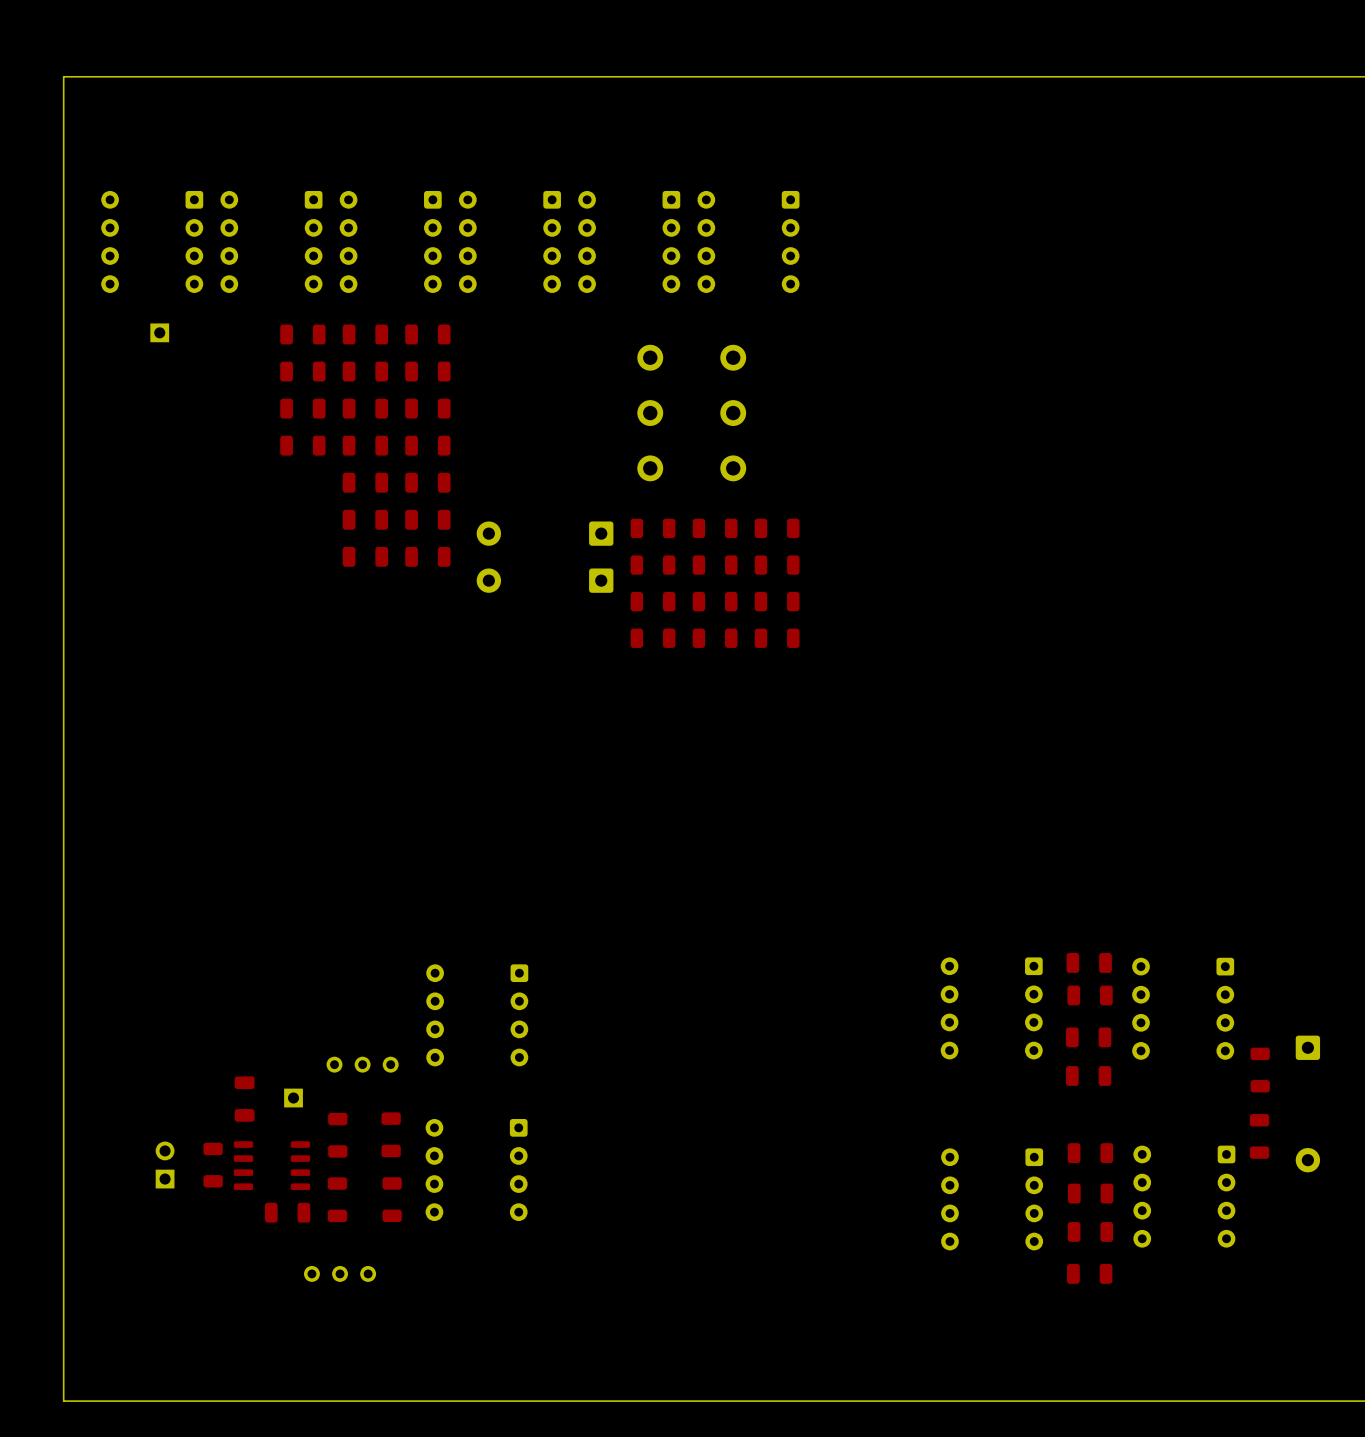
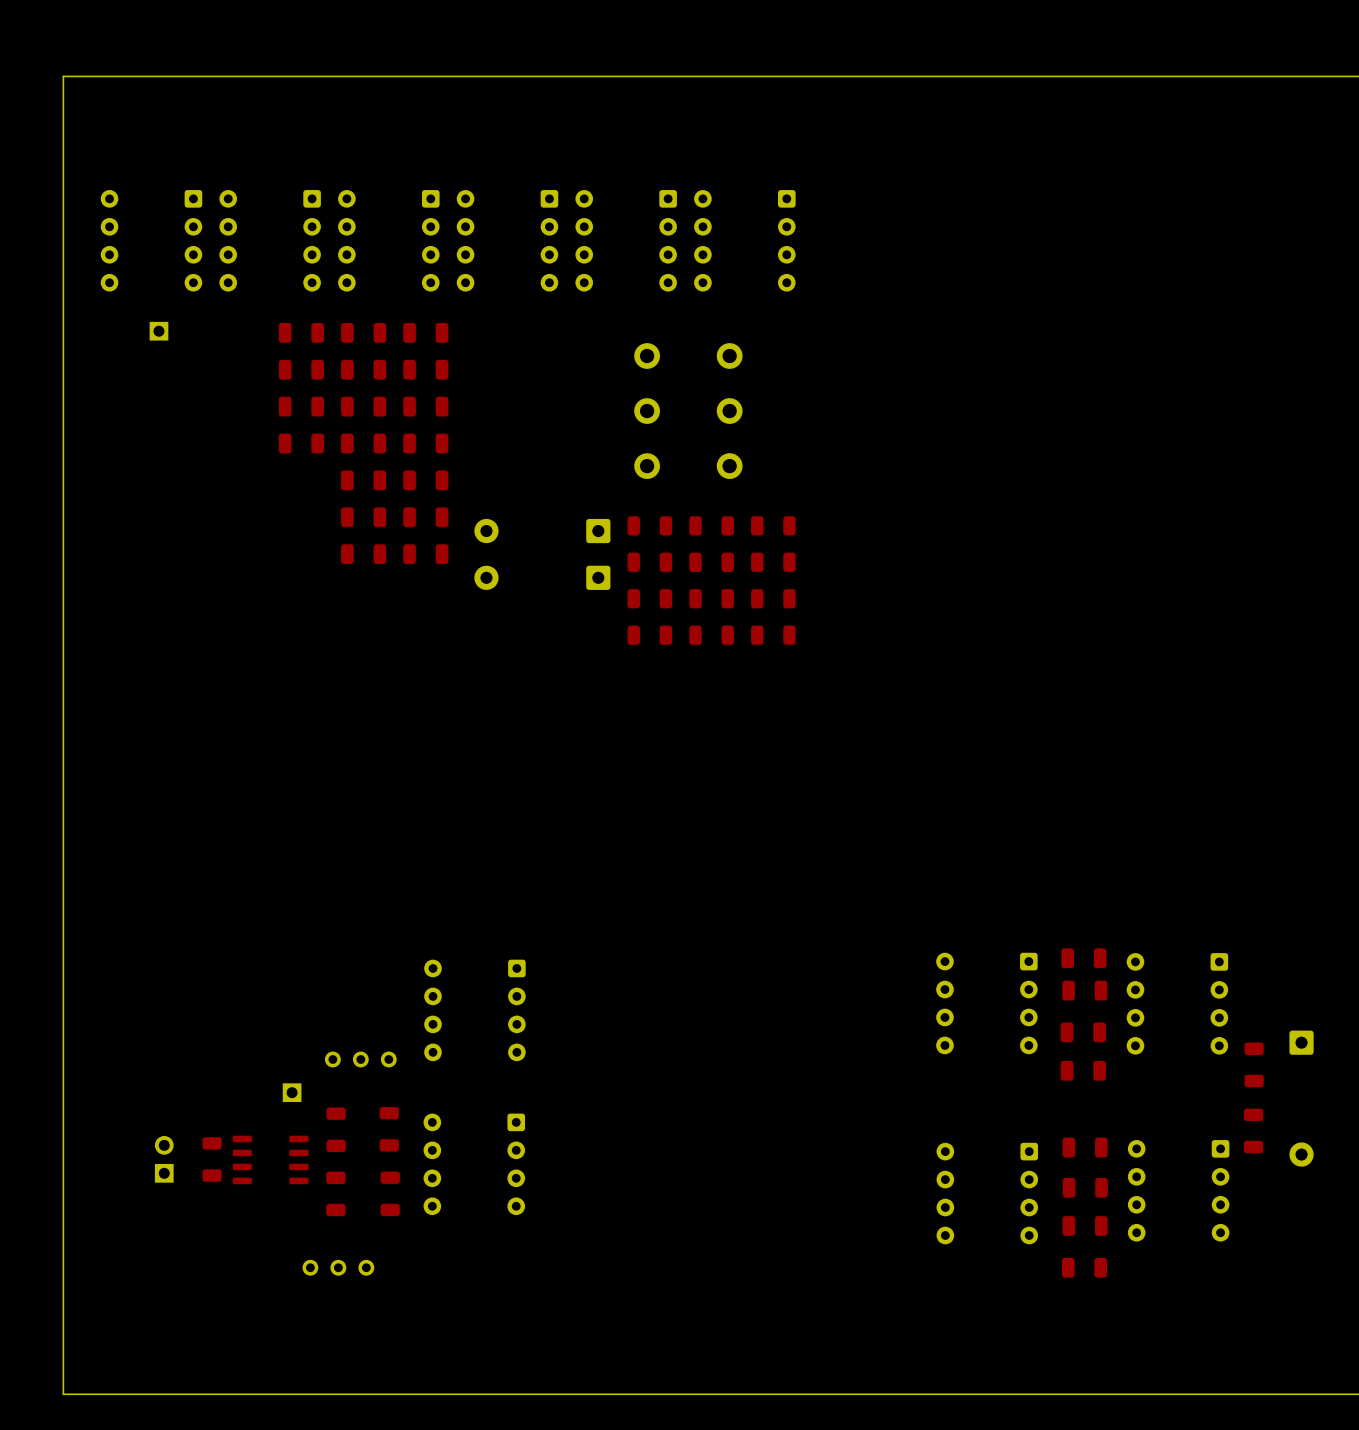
part: (244, 1099) -> none
part: (287, 1212) -> none

